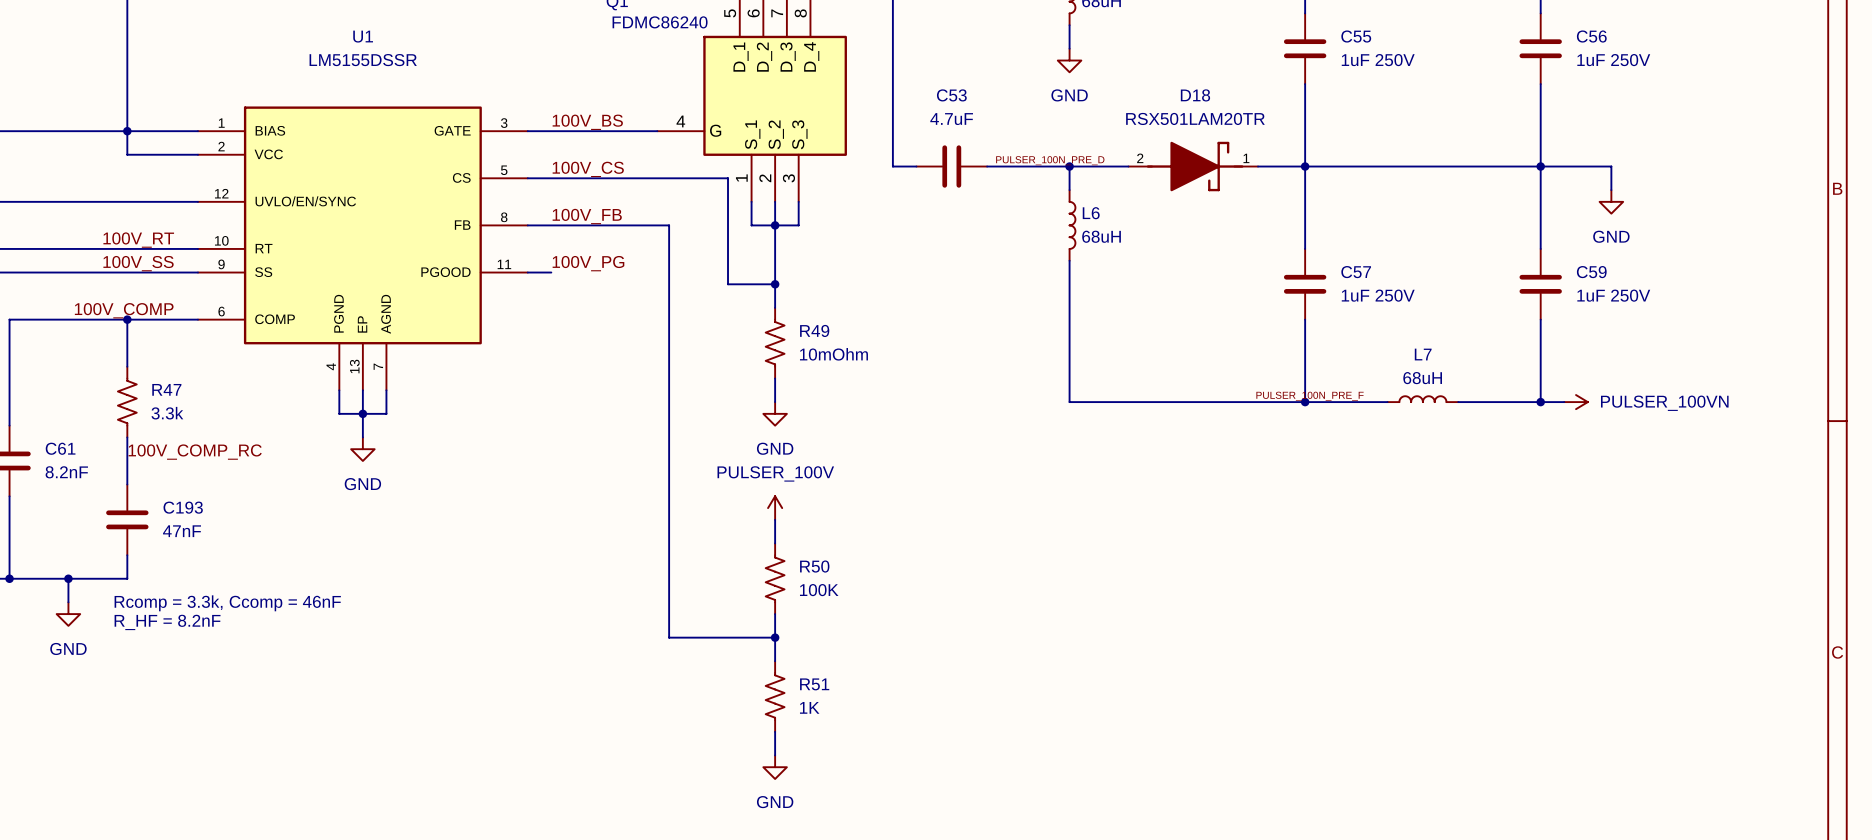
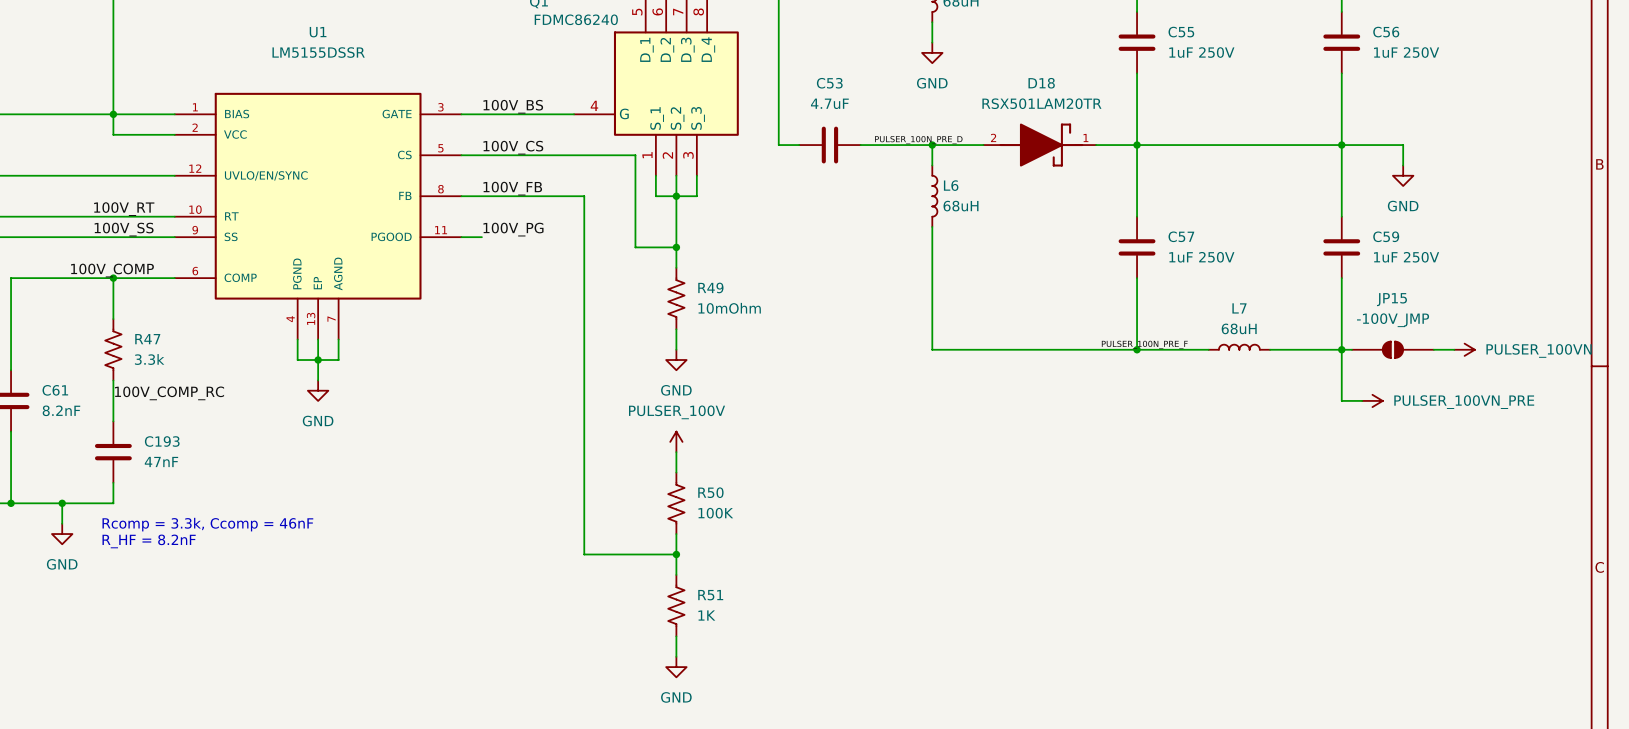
wire: none -> (1341, 349) (1341, 400) (1362, 400)
power symbol position: PULSER_100VN (1576, 402) -> PULSER_100VN (1464, 349)
JP15: none -> -100V_JMP (1392, 349)
wire: none -> (1433, 349) (1454, 349)
power symbol: none -> PULSER_100VN_PRE (1372, 400)

